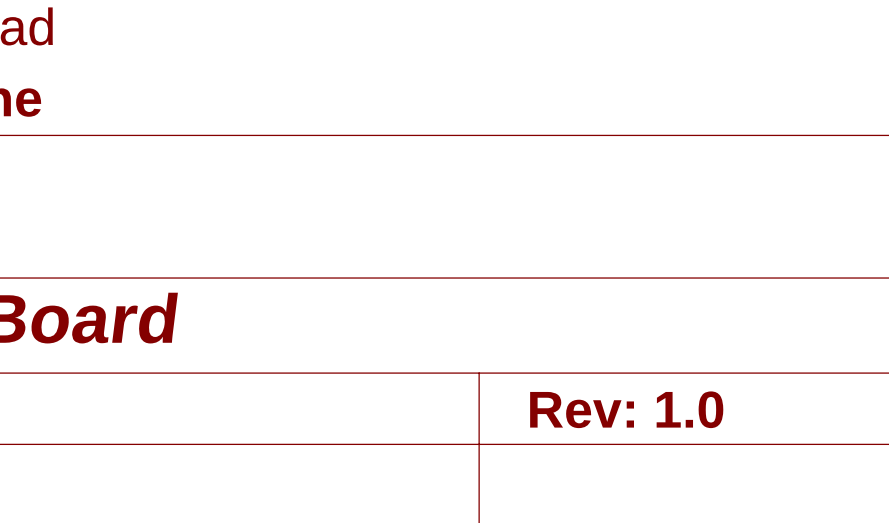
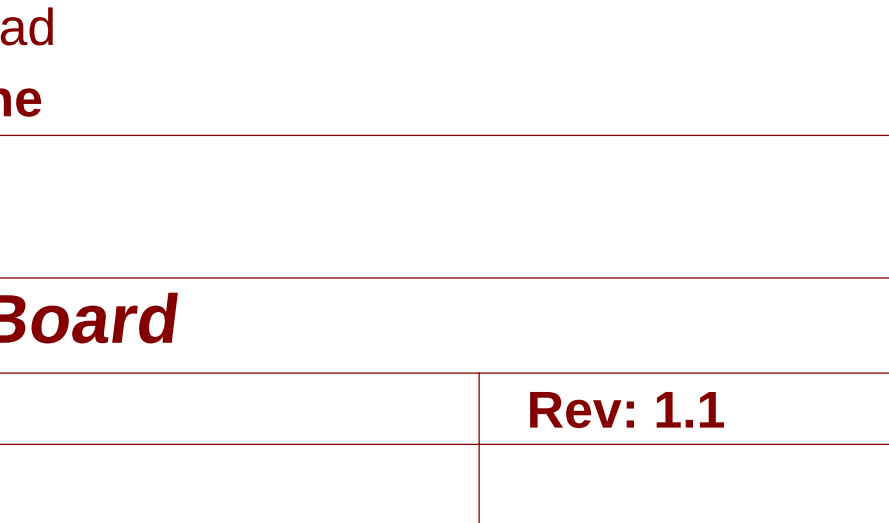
title block: Rev: 1.0 (626, 409) -> Rev: 1.1 (627, 410)

